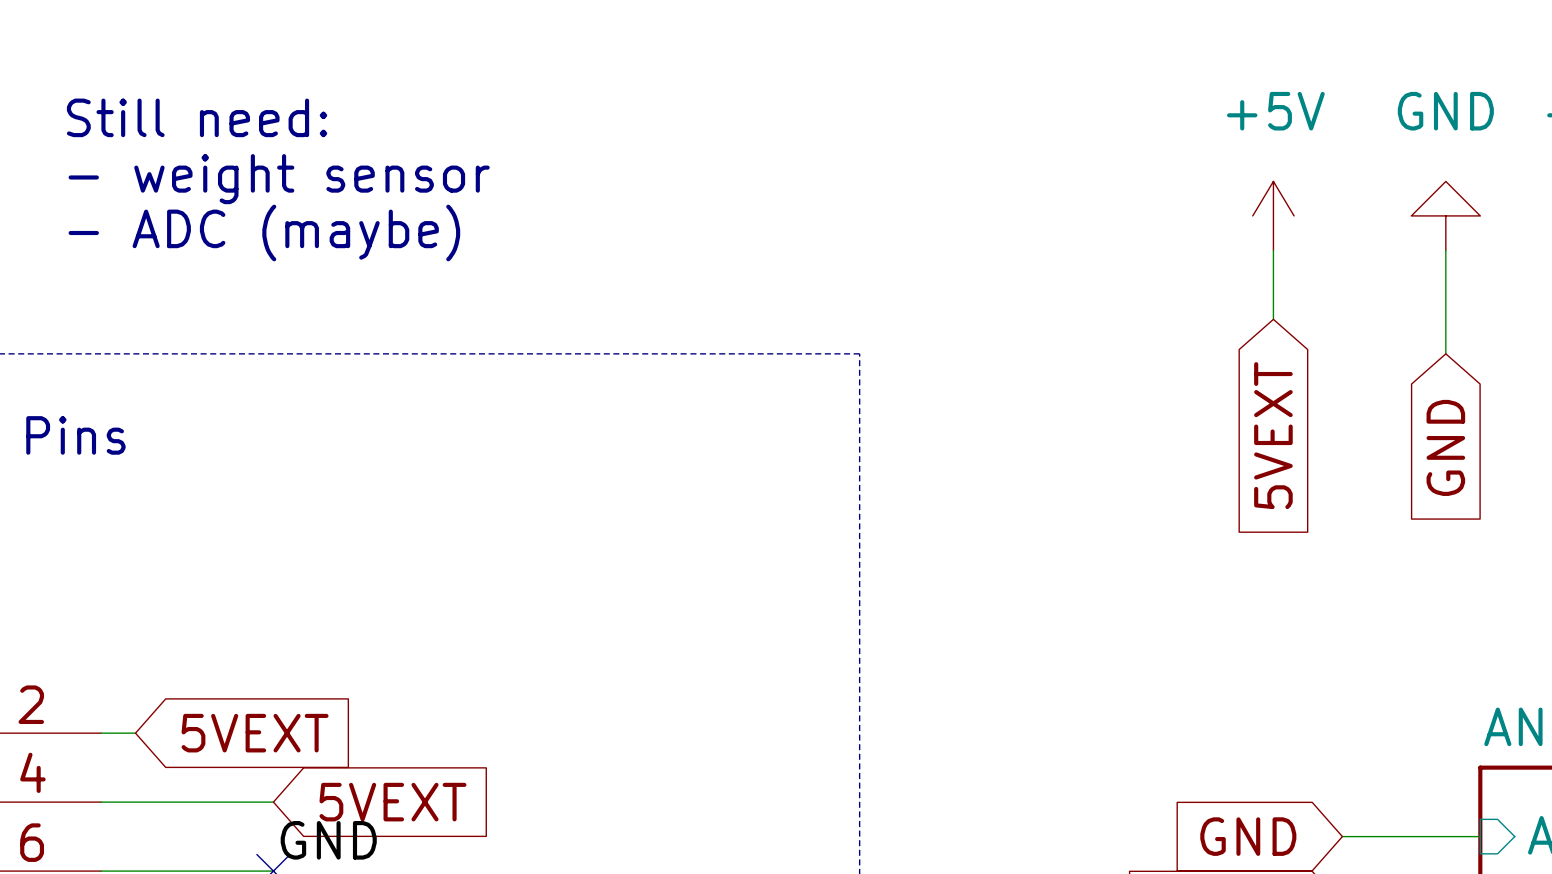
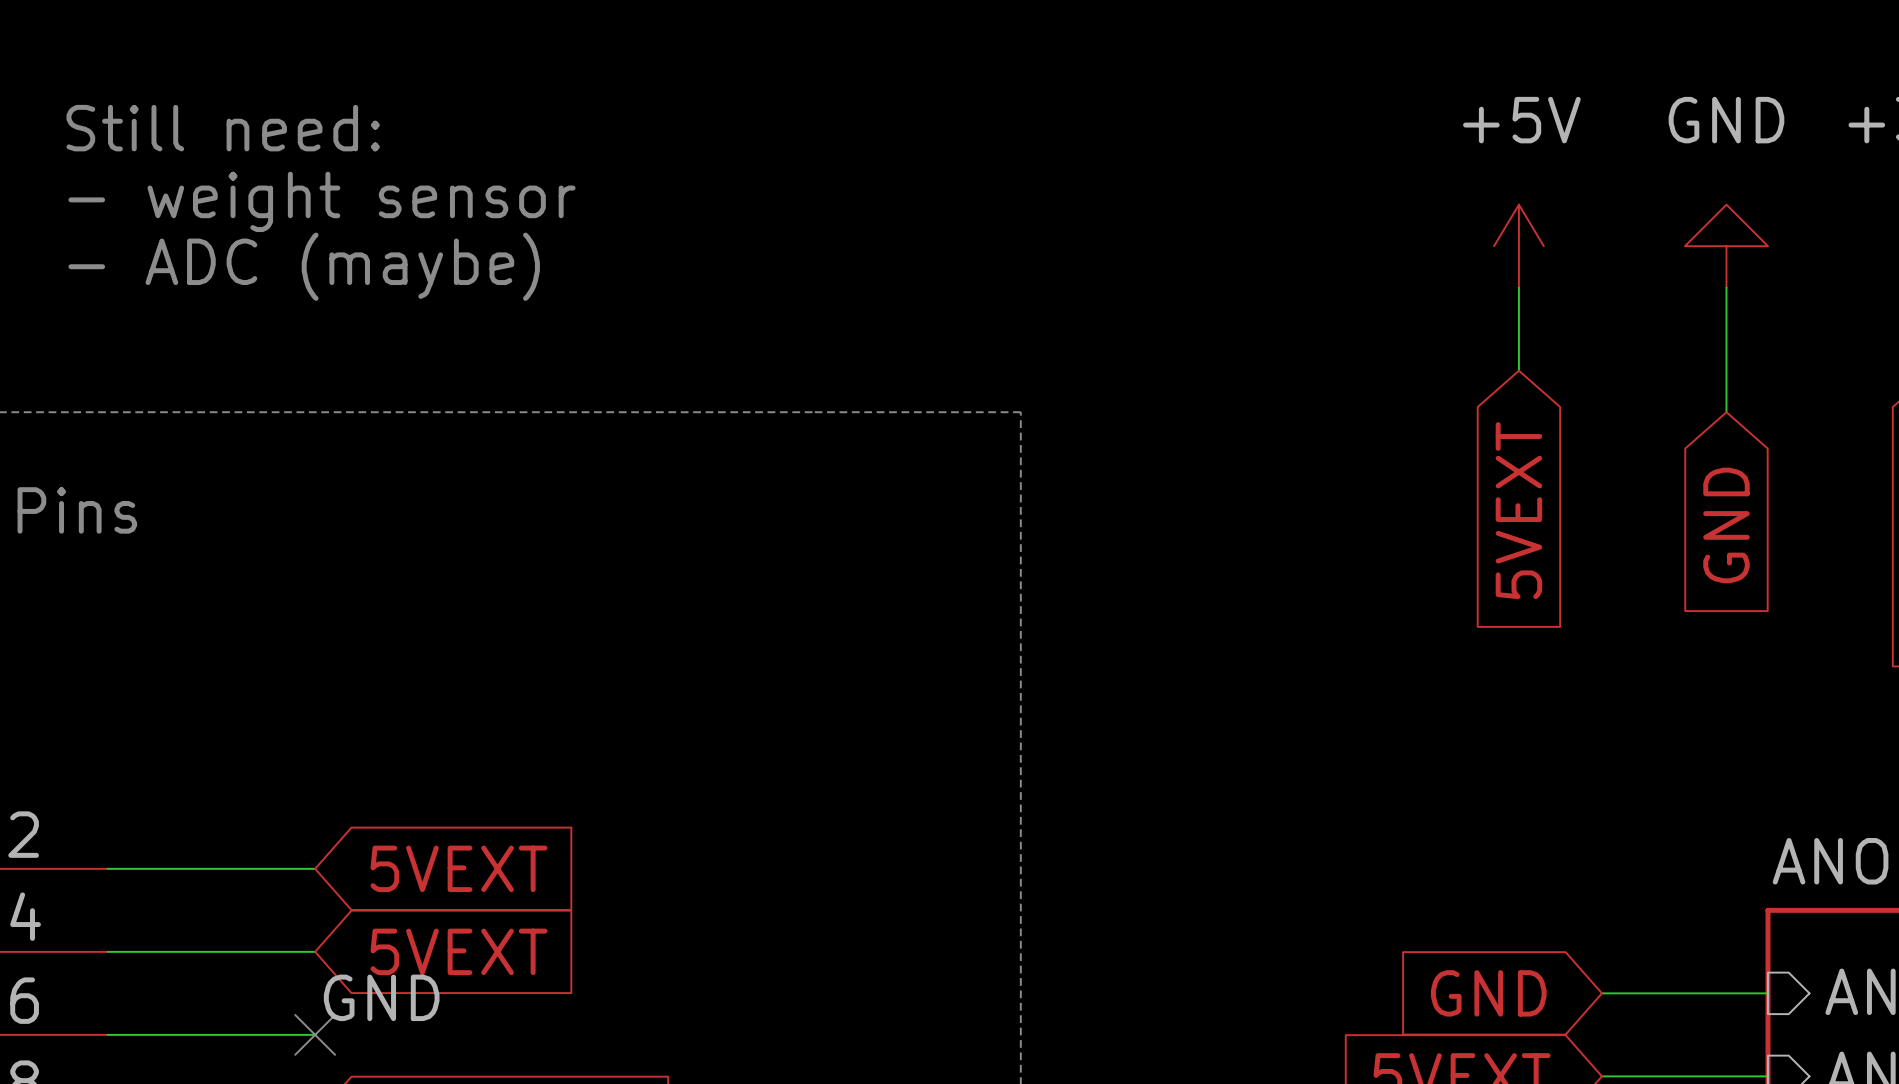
wire: none -> (149, 868) (315, 868)
global label position: 5VEXT (255, 733) -> 5VEXT (459, 868)

